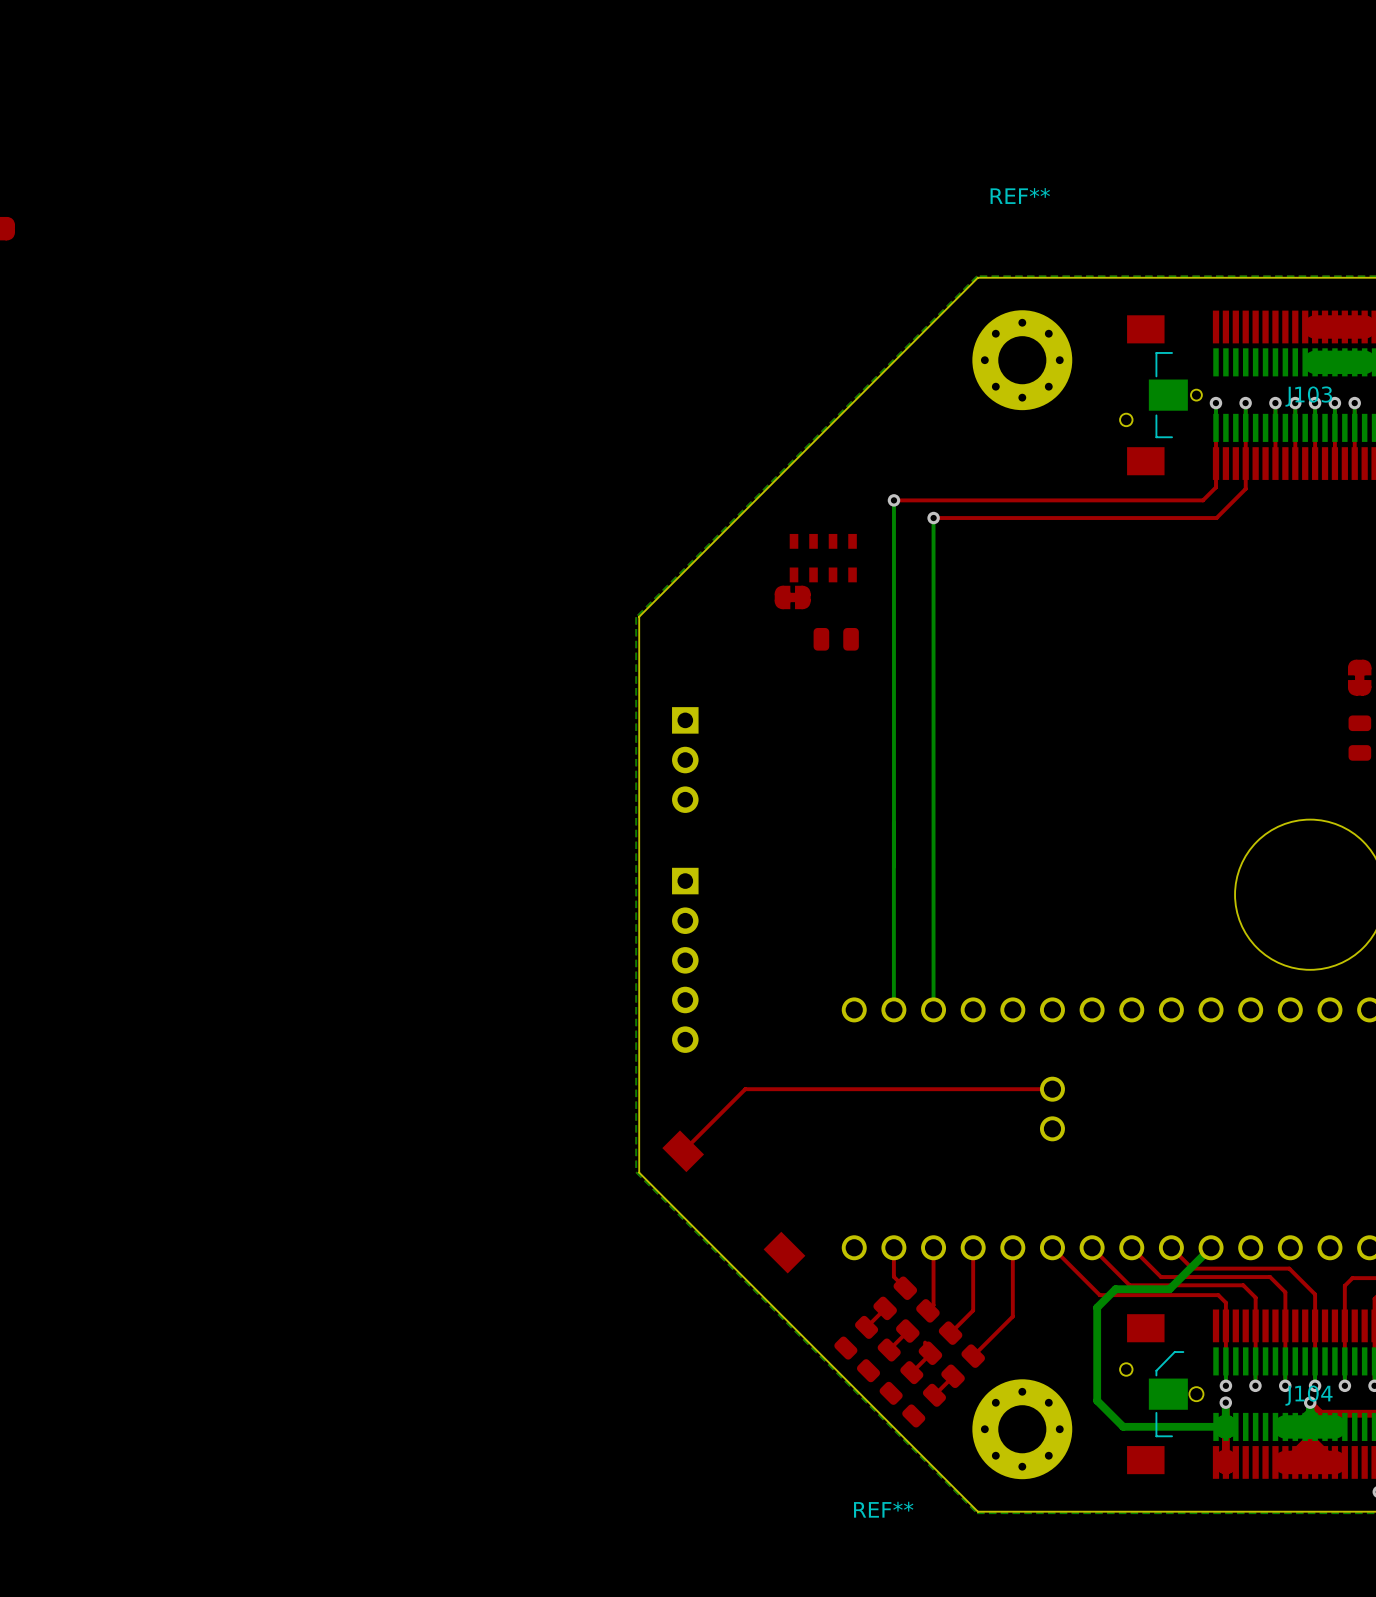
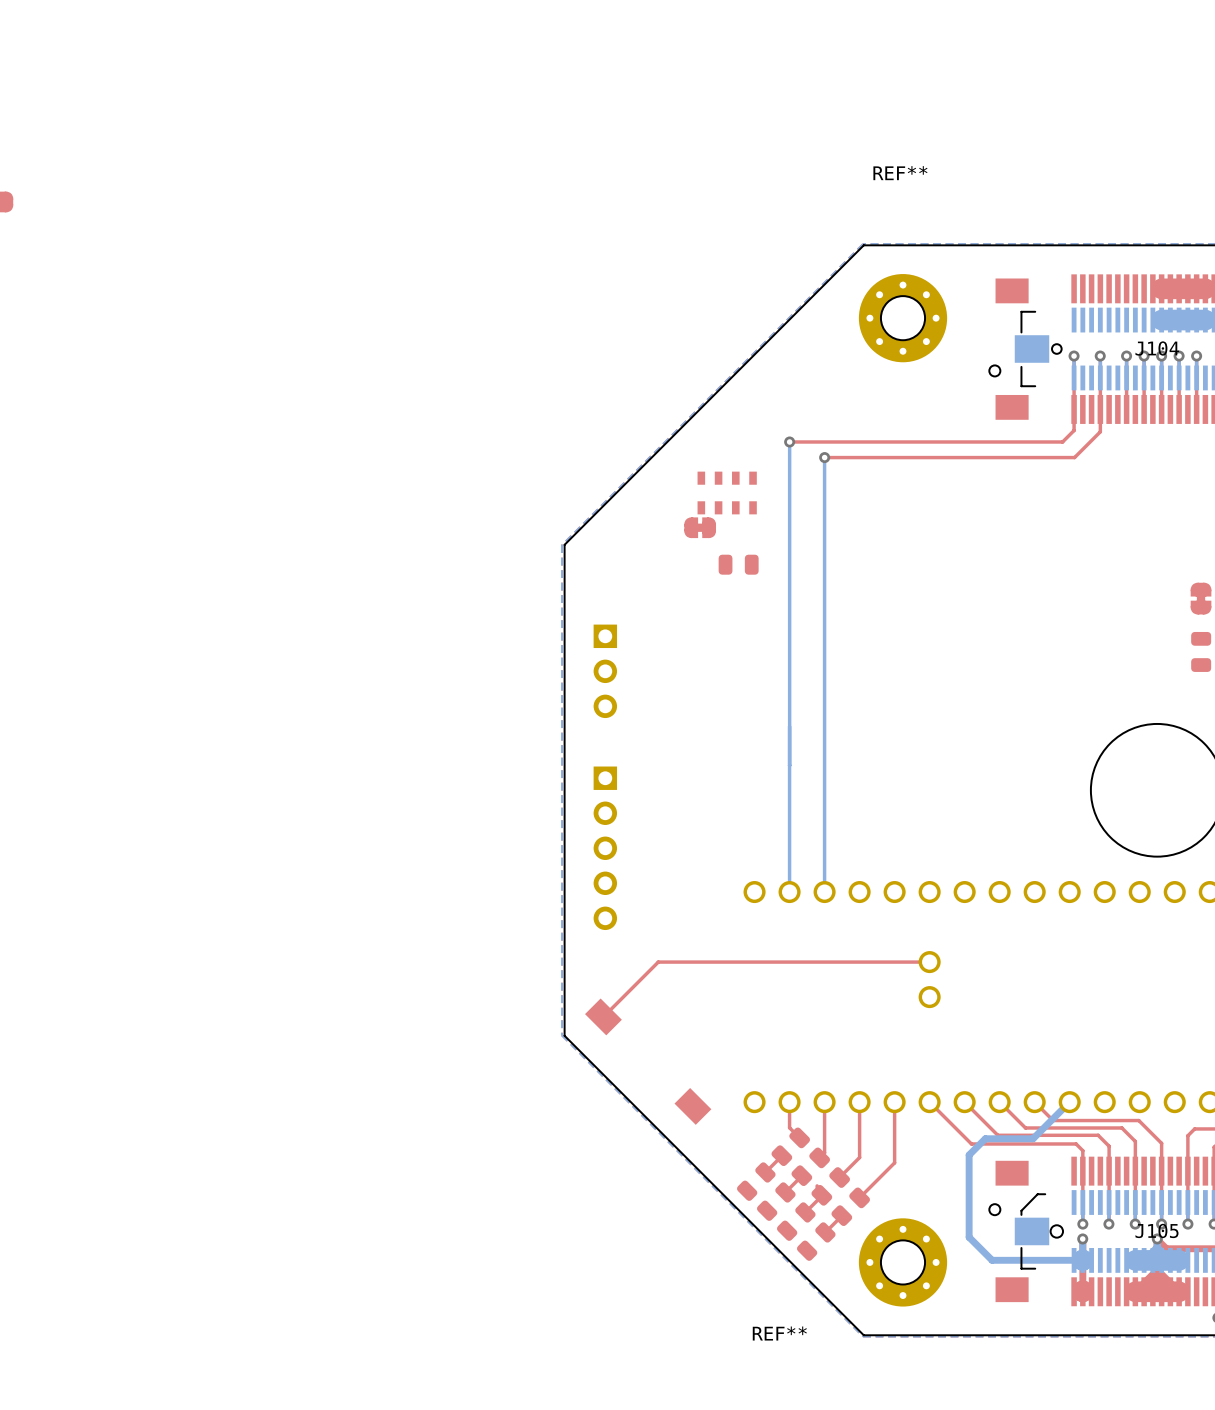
J103 name: J103 (1308, 396) -> J104 (1157, 348)
J104 name: J104 (1309, 1395) -> J105 (1156, 1230)

